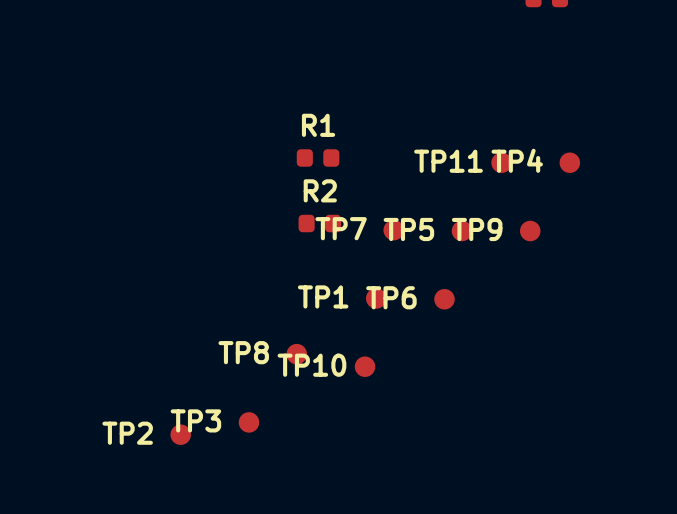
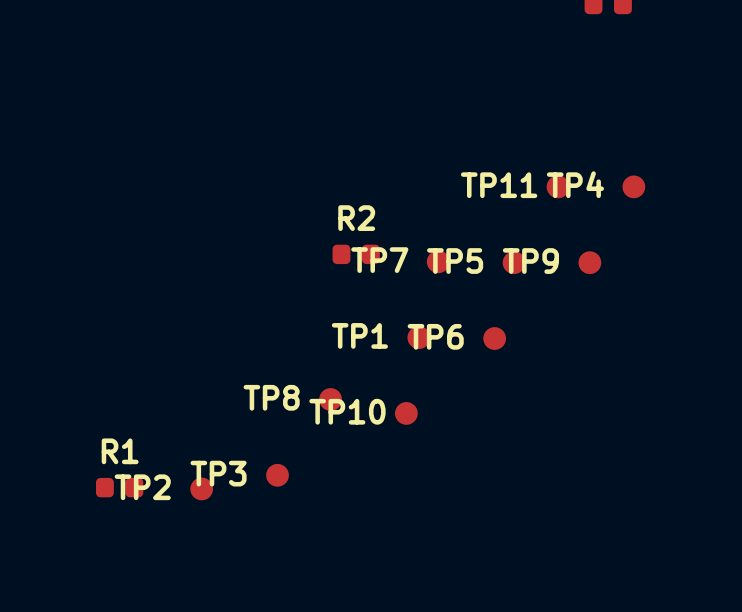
R1 position: (318, 157) -> (119, 487)

